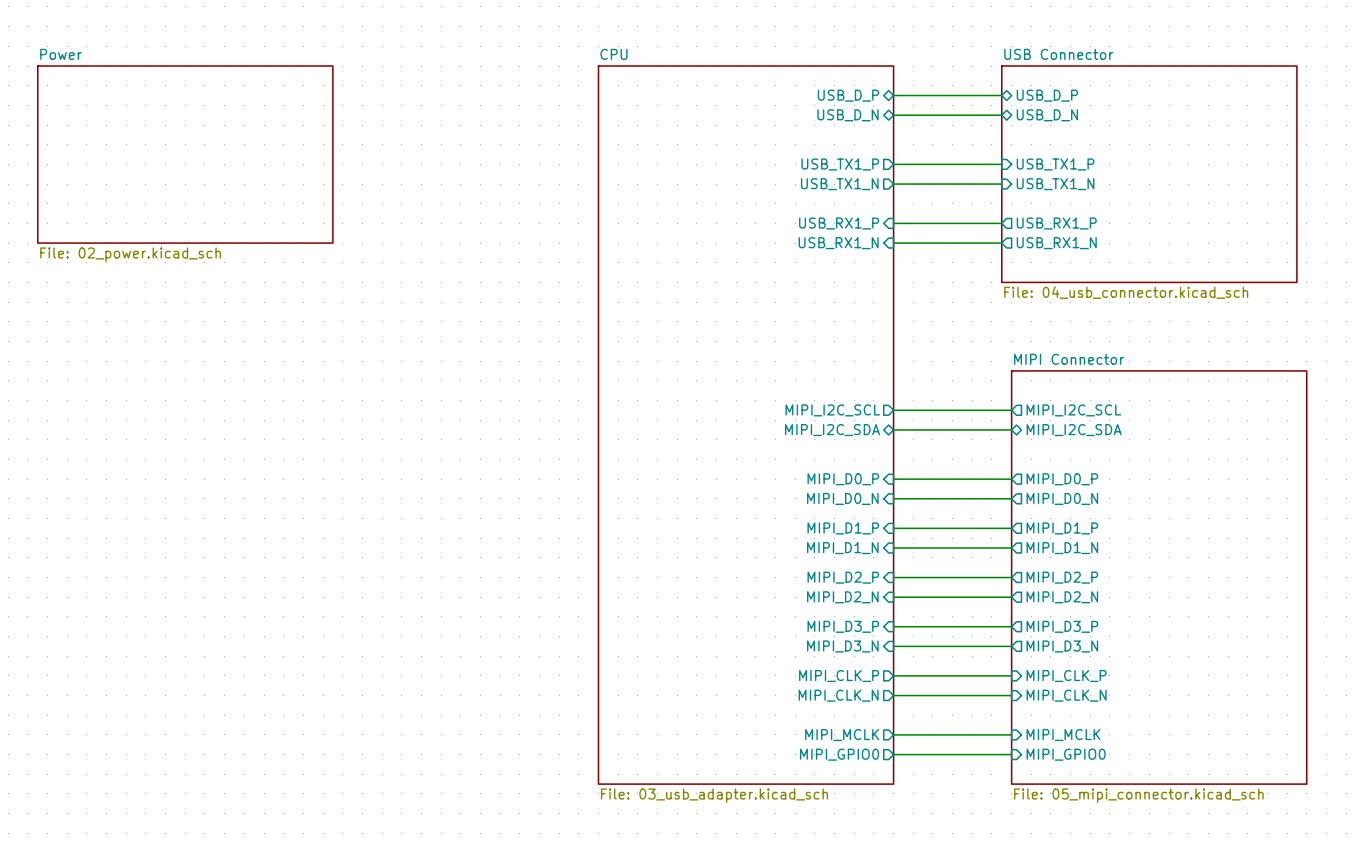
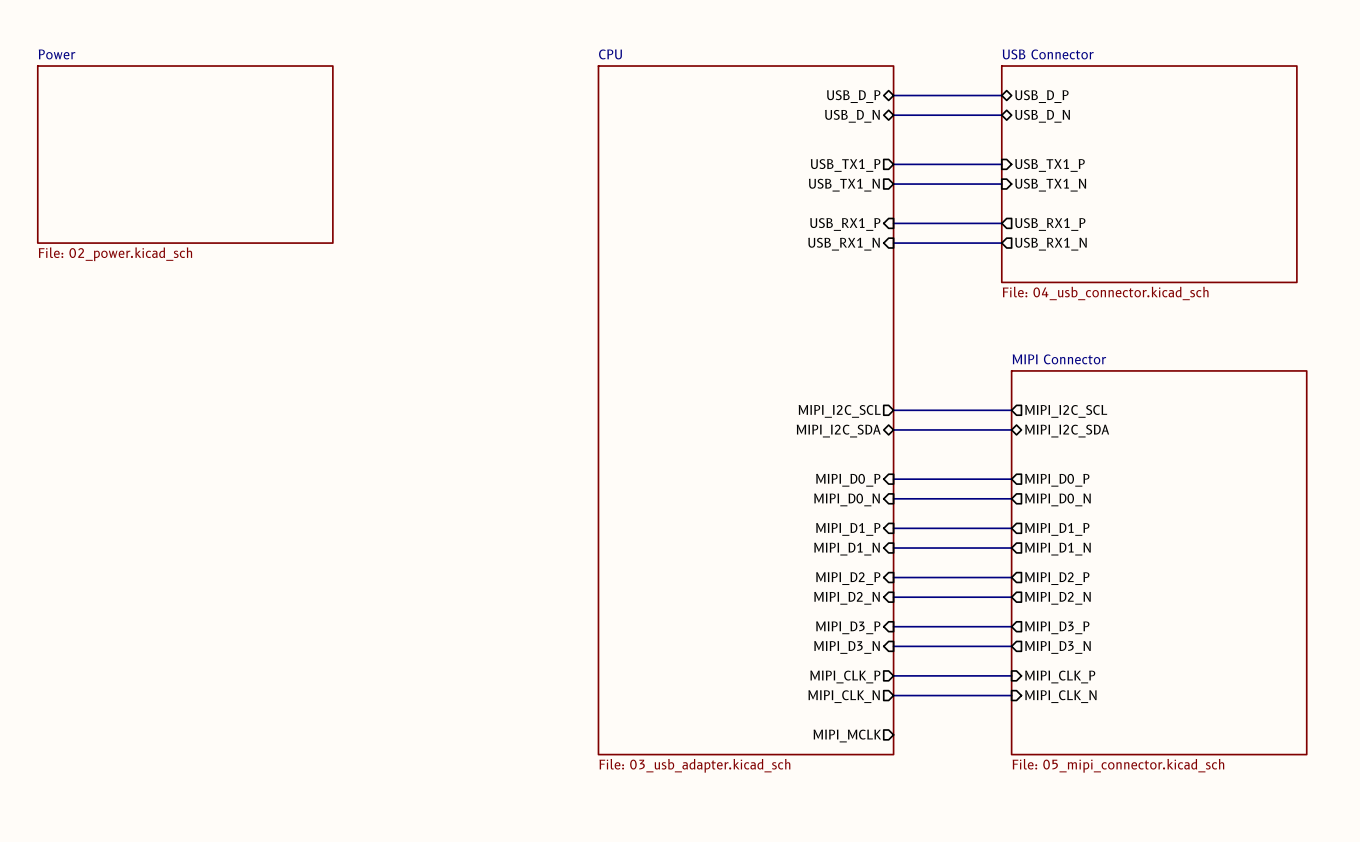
sheet CPU: none -> File: 03_usb_adapter.kicad_sch (746, 410)
sheet CPU: File: 03_usb_adapter.kicad_sch (746, 425) -> none
sheet MIPI Connector: none -> File: 05_mipi_connector.kicad_sch (1159, 562)
sheet MIPI Connector: File: 05_mipi_connector.kicad_sch (1159, 577) -> none
wire: (893, 734) (1011, 734) -> none
sheet pin: MIPI_MCLK (1063, 735) -> none
sheet pin: MIPI_GPIO0 (839, 754) -> none
wire: (893, 754) (1011, 754) -> none
sheet pin: MIPI_GPIO0 (1066, 754) -> none

